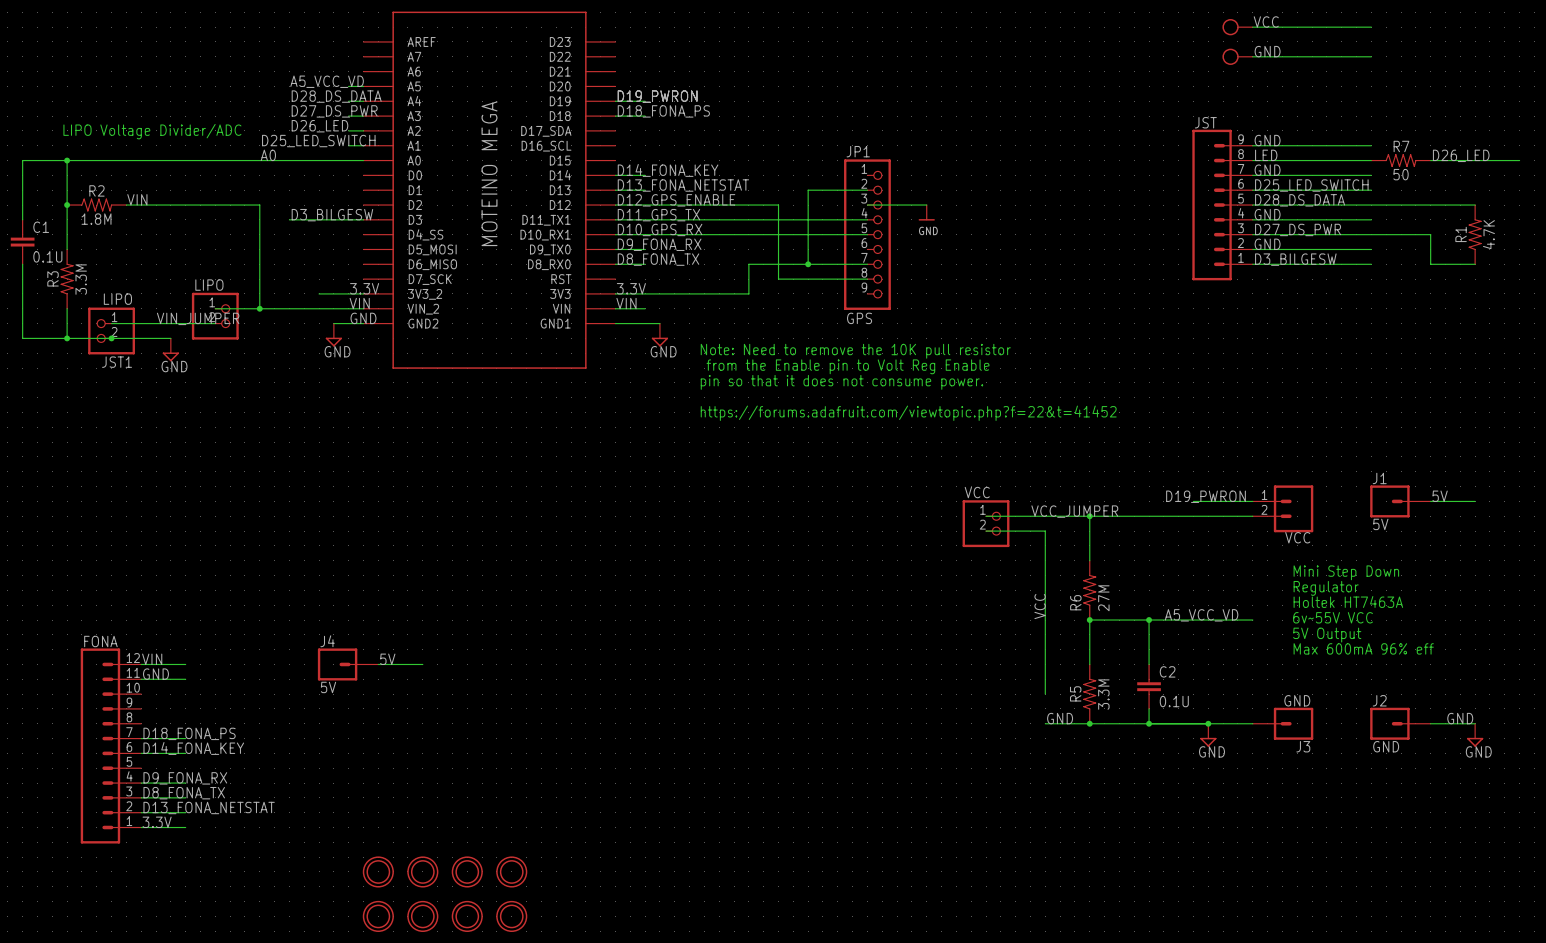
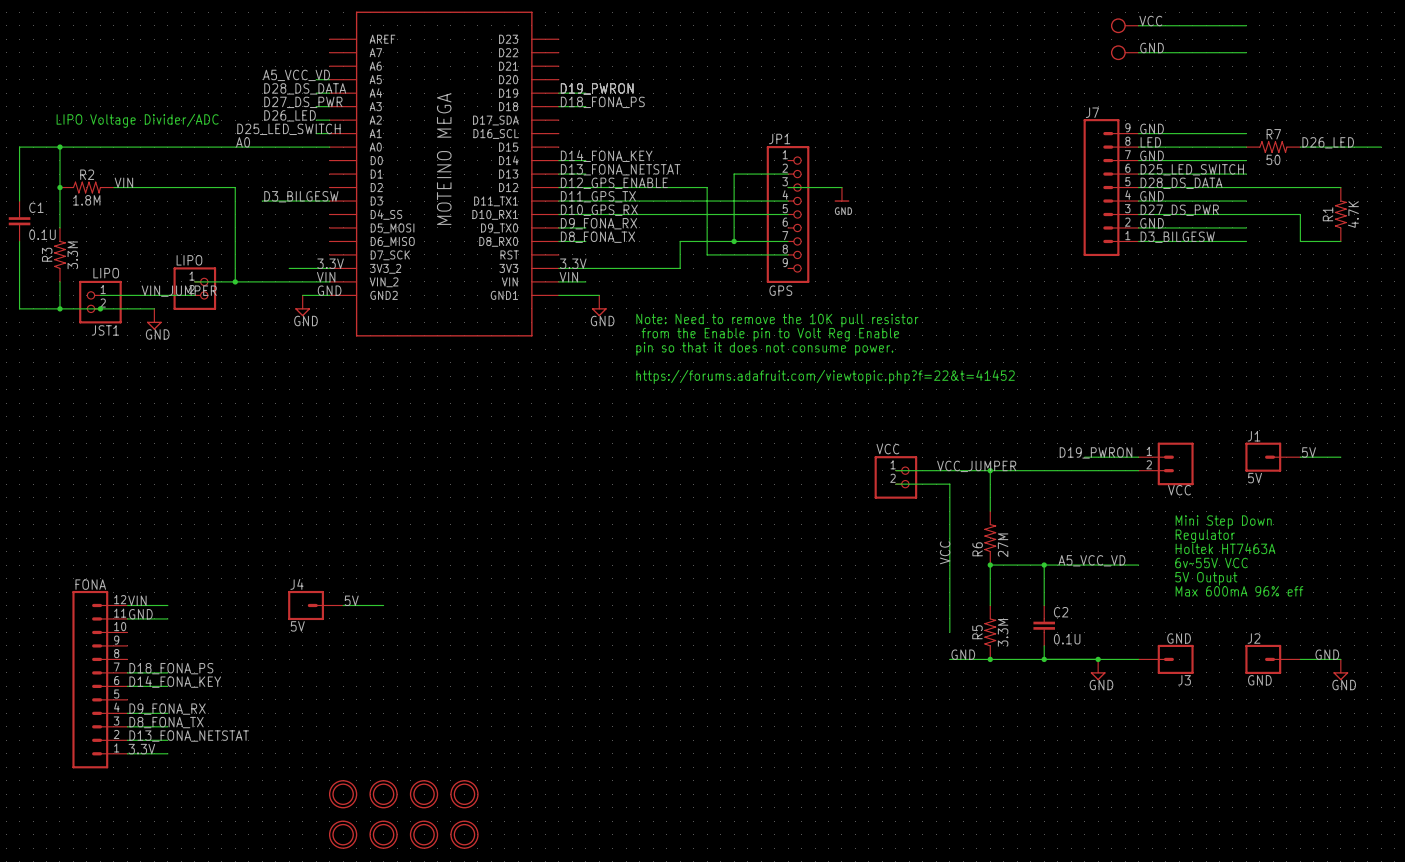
JST name: JST (1205, 122) -> J7 (1092, 112)

